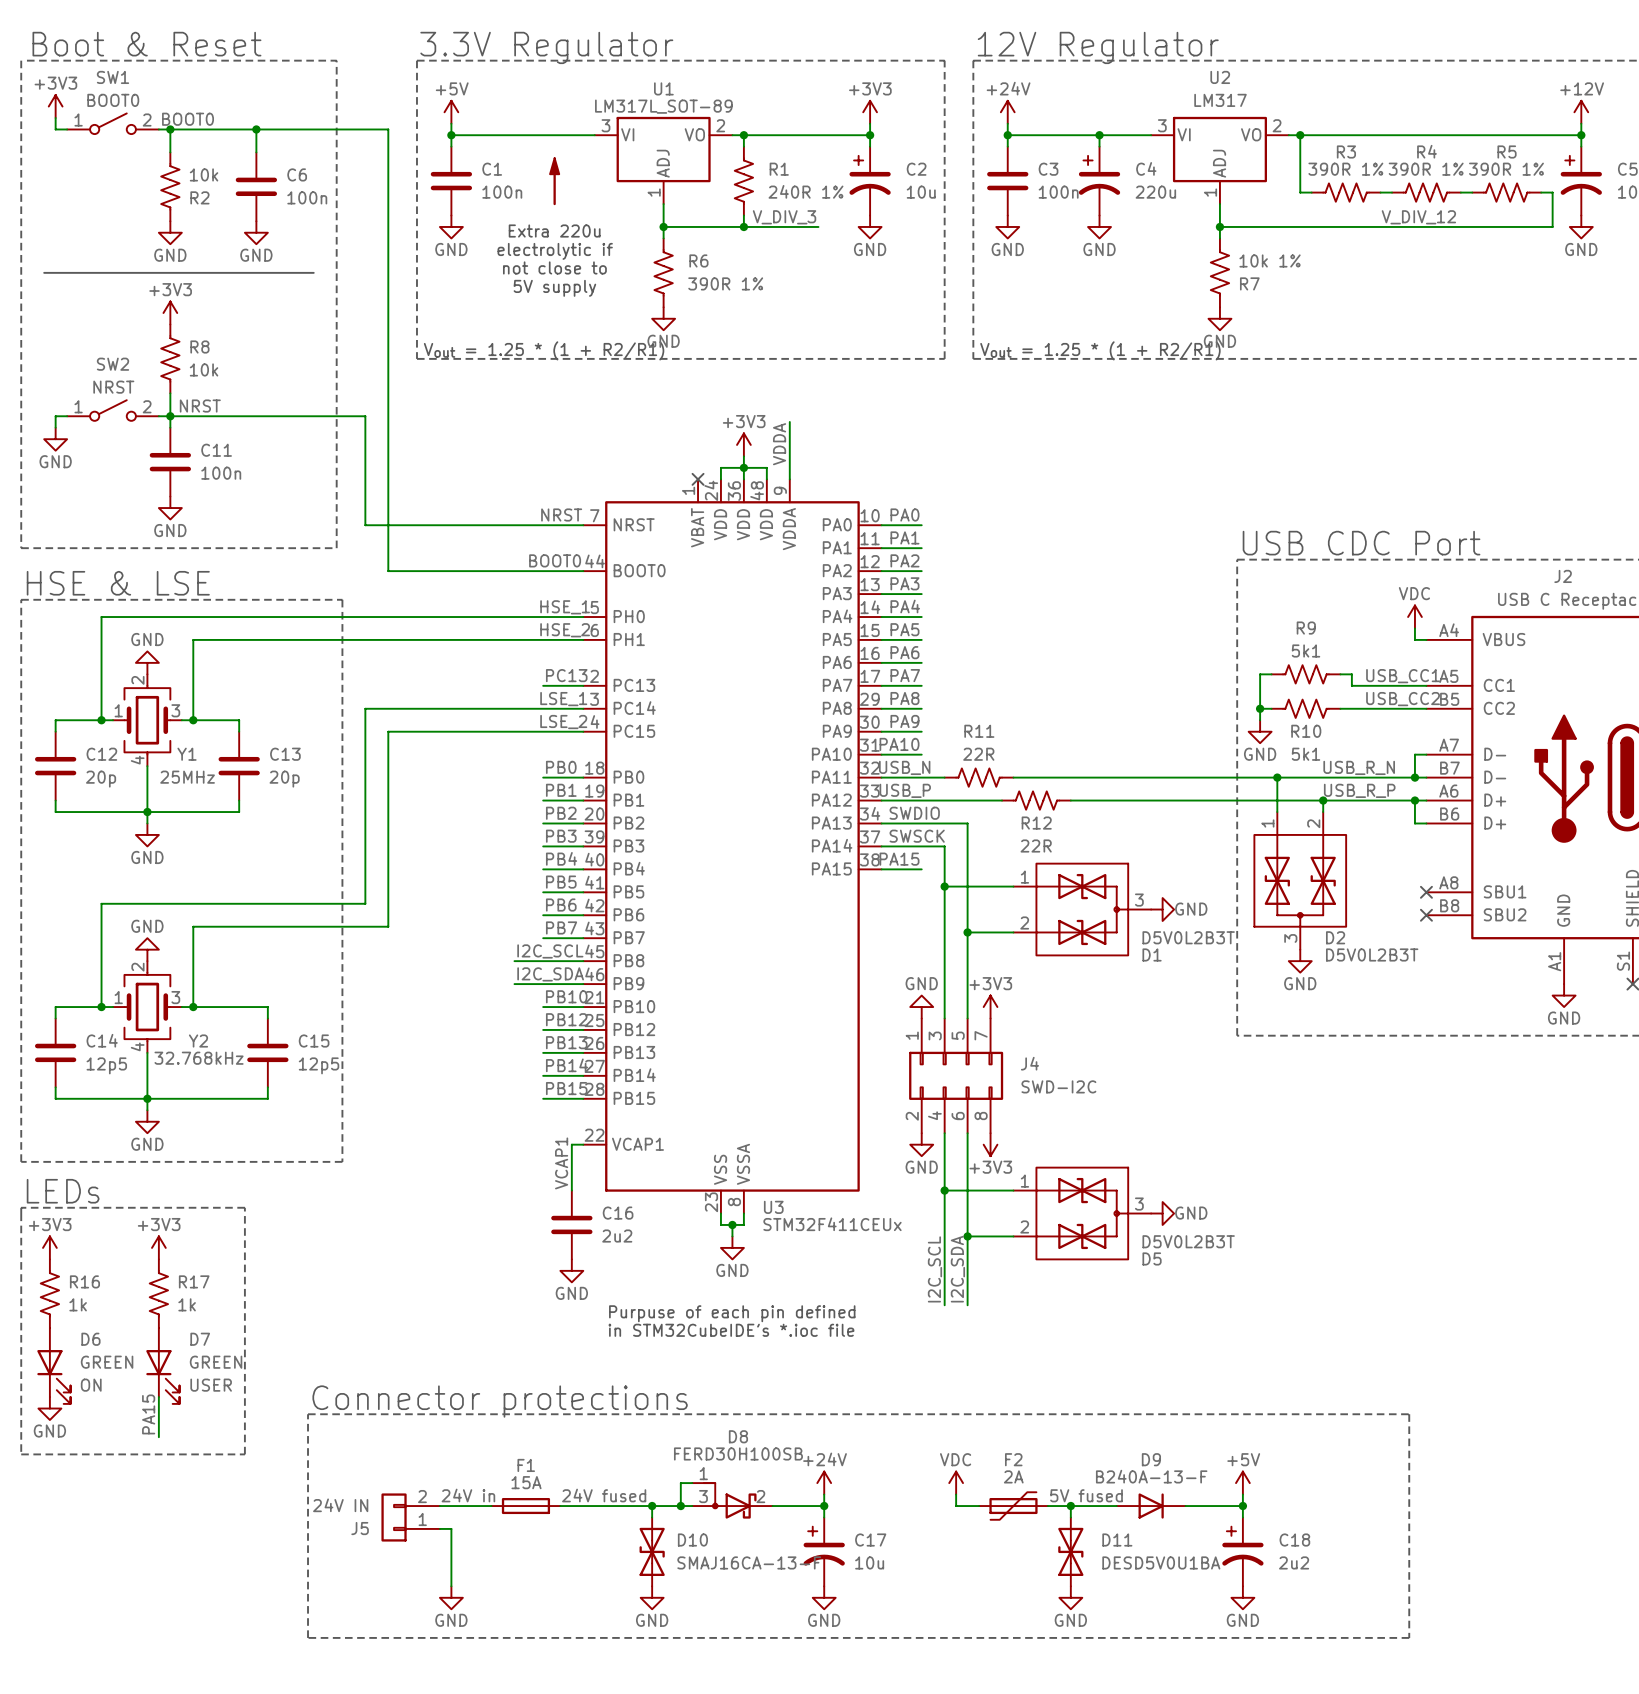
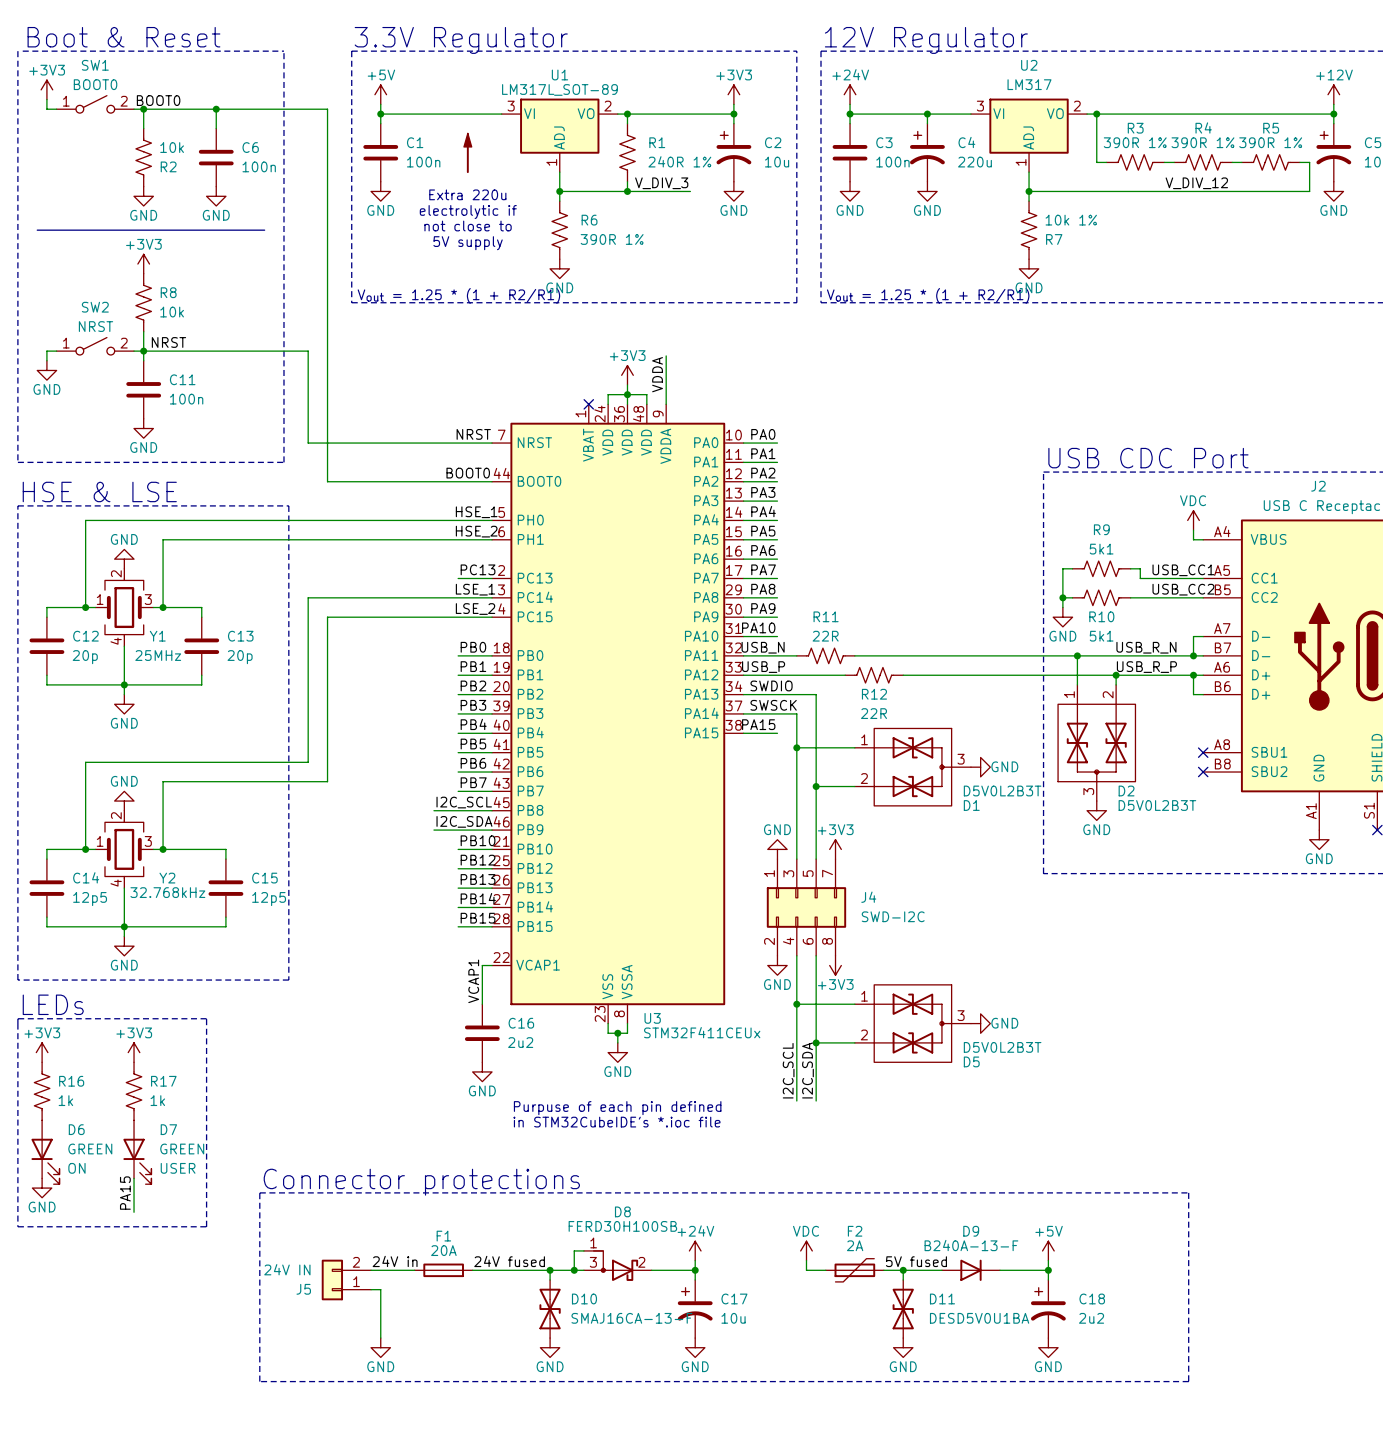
F1 value: 15A (526, 1482) -> 20A (443, 1250)

